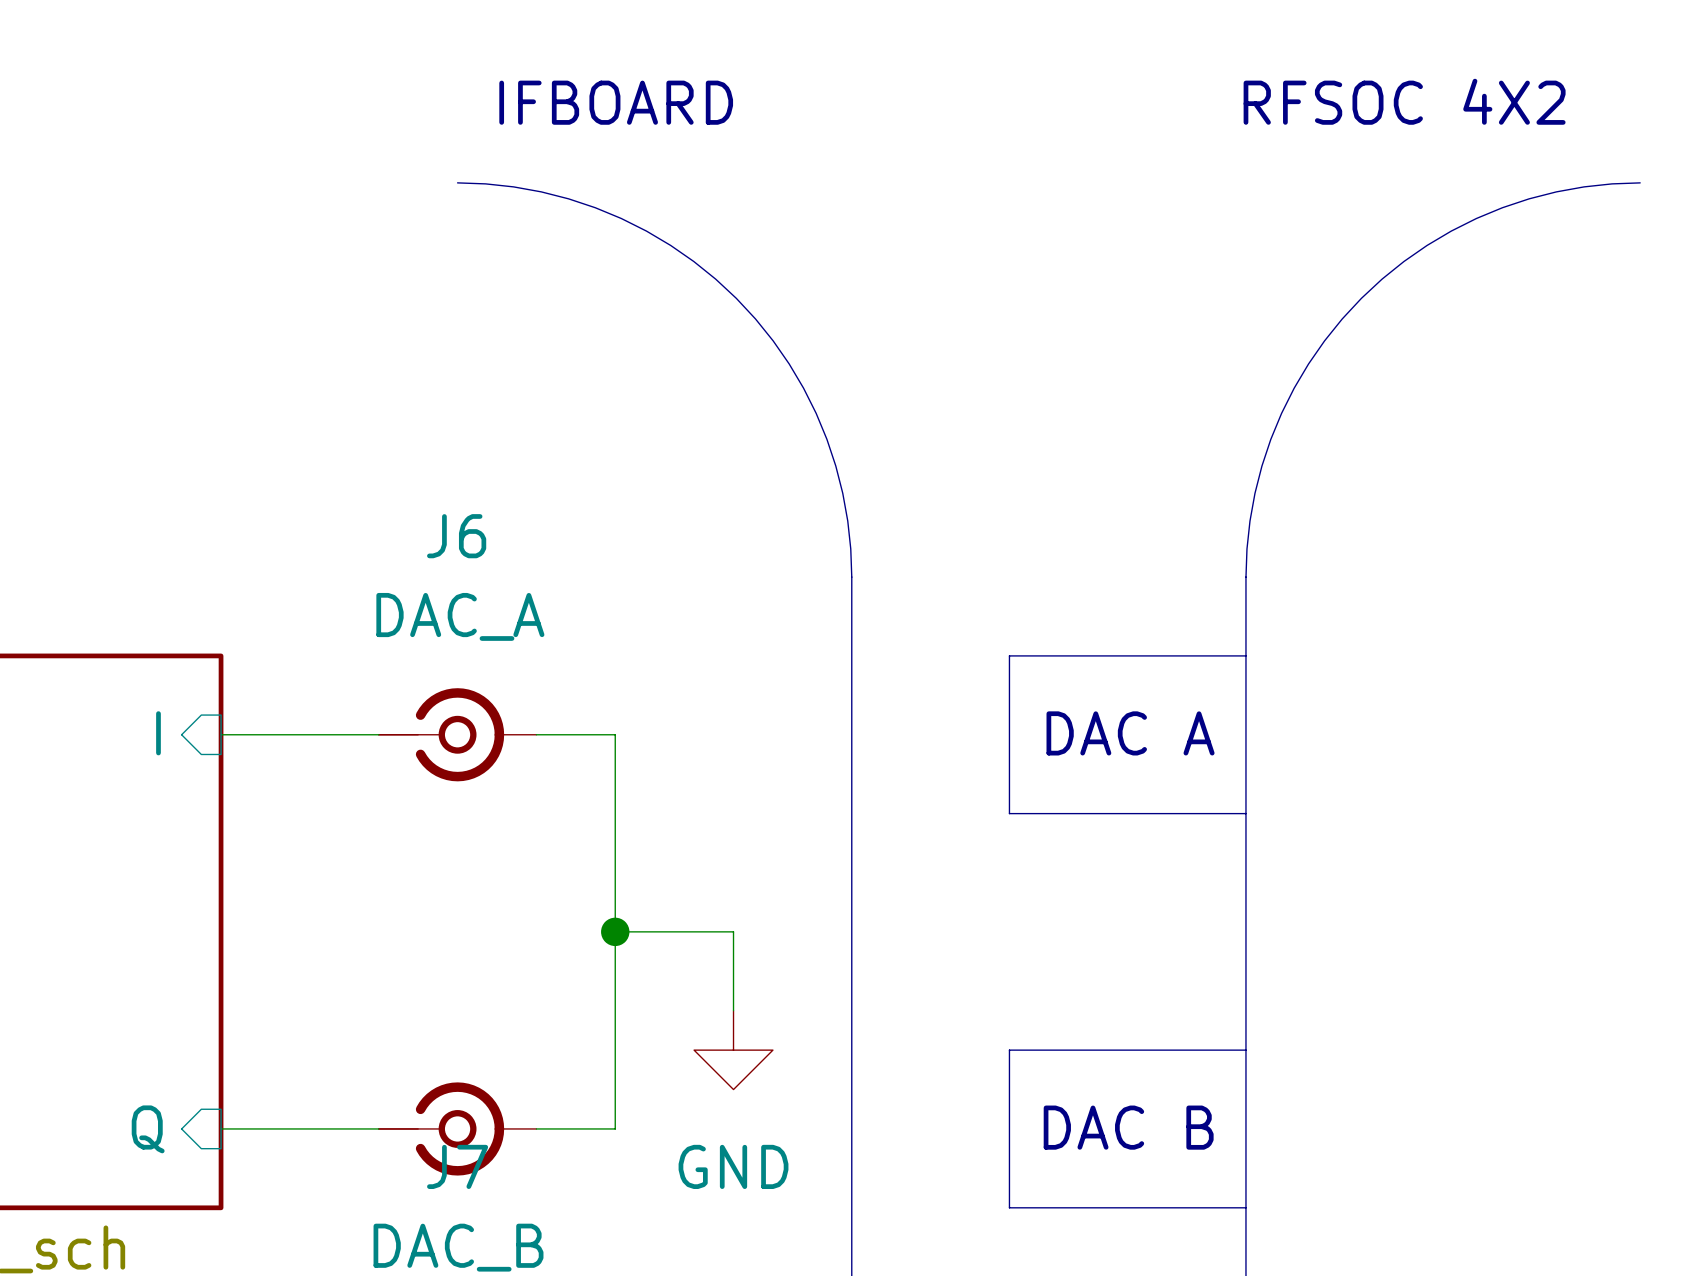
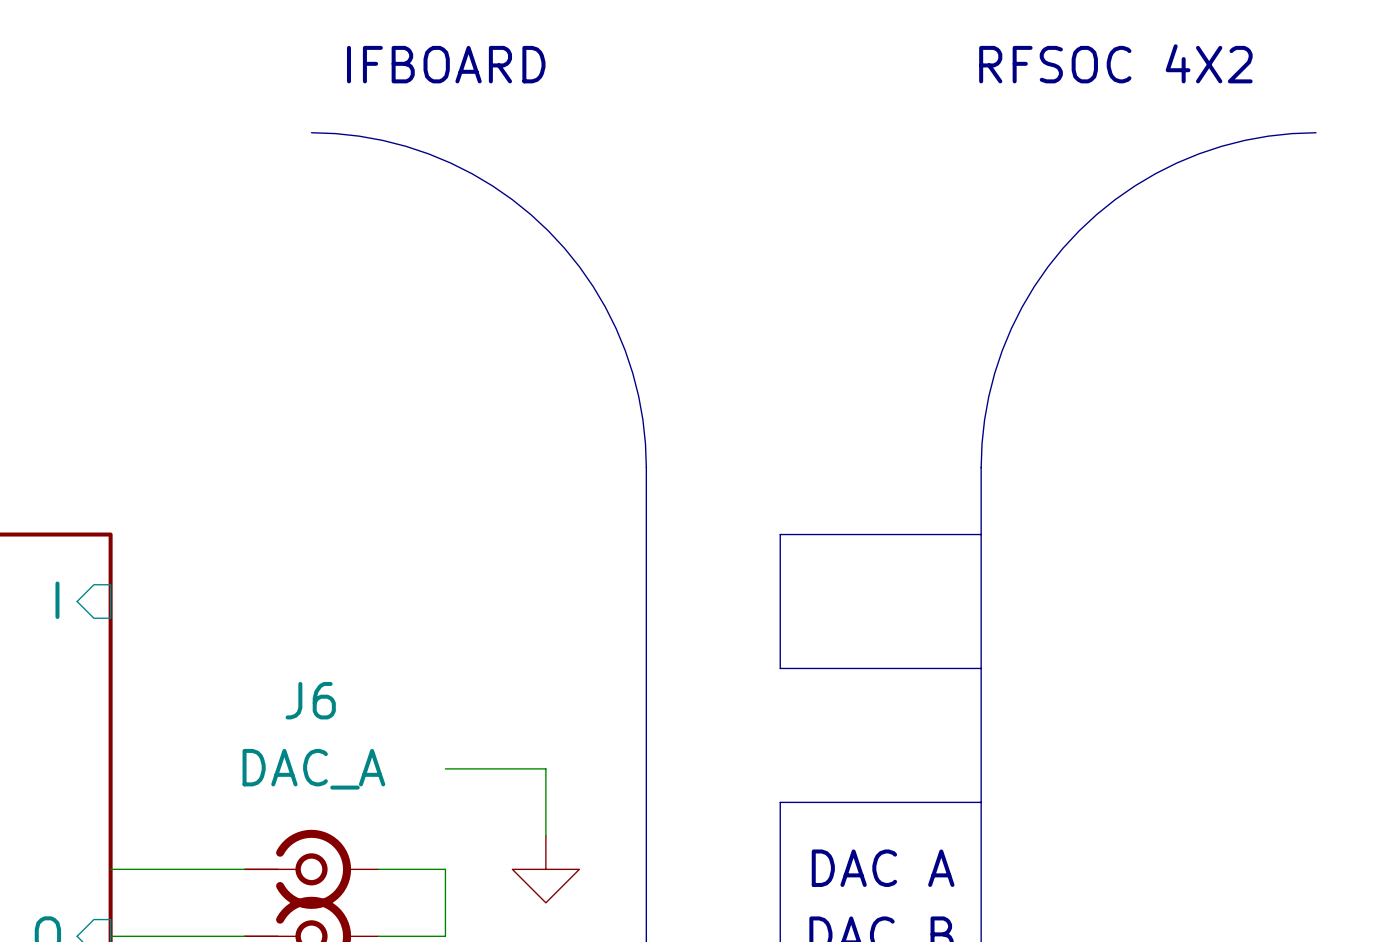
text position: DAC A (1130, 733) -> DAC A (883, 868)
wire: (221, 734) (378, 734) -> (110, 869) (244, 869)
J6 position: (457, 734) -> (311, 869)
wire: (536, 734) (615, 734) (615, 1050) -> (378, 869) (445, 869)
junction: (615, 931) -> none
line: (1009, 1050) (1245, 1050) -> (780, 869) (780, 802) (981, 802)

